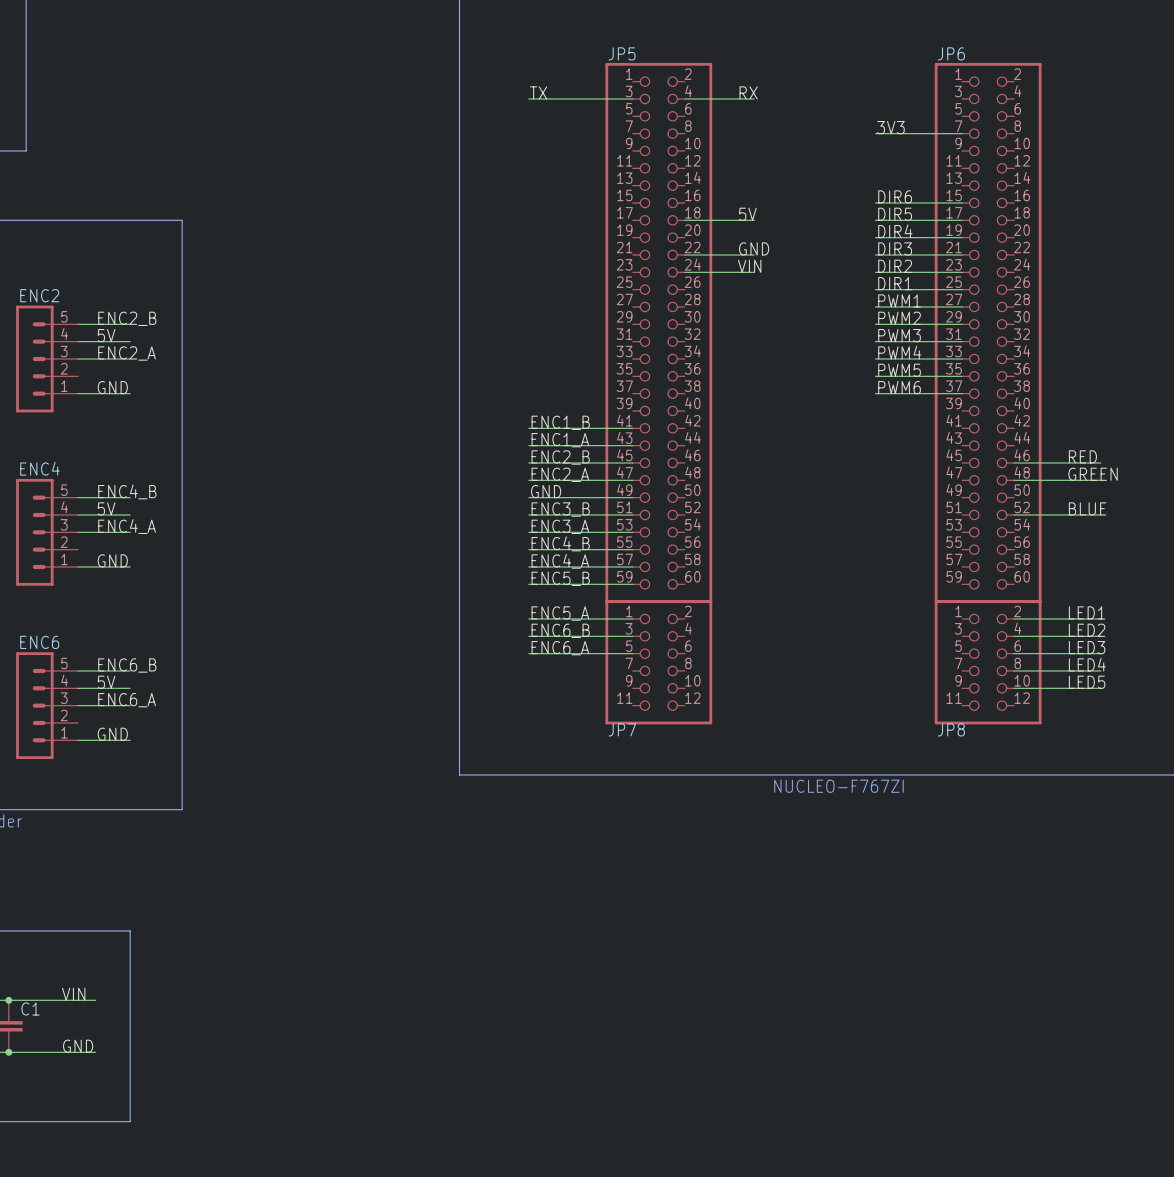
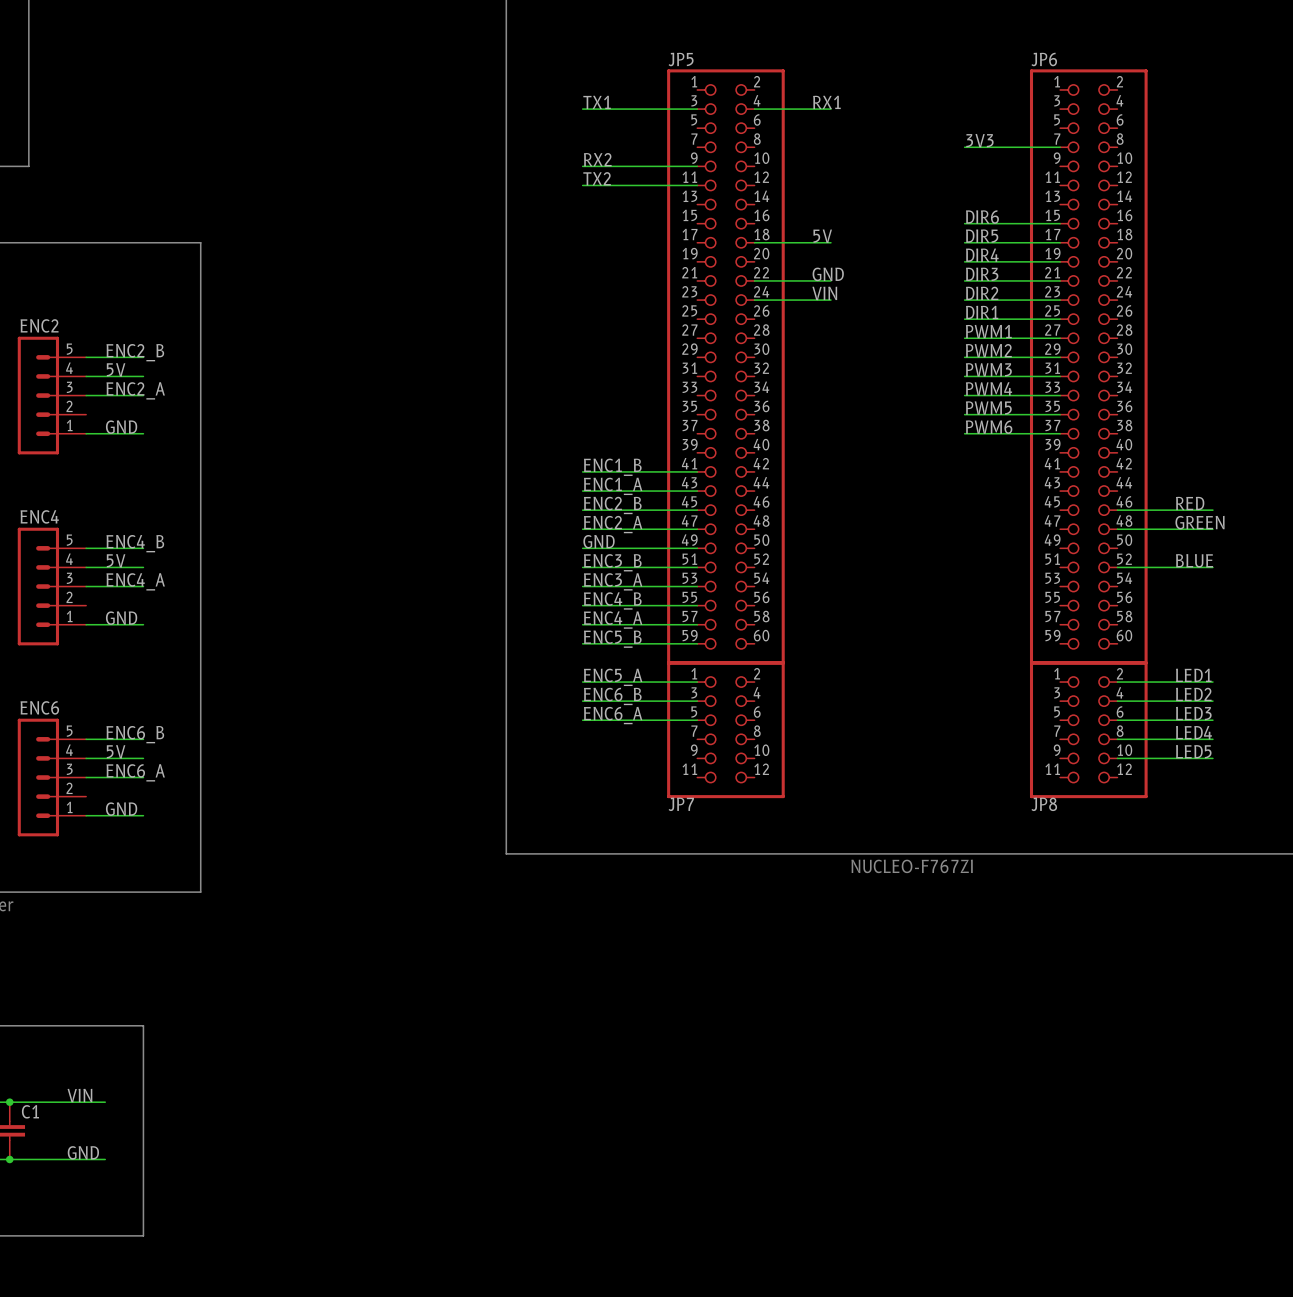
label: TX (538, 92) -> TX1 (597, 102)
label: RX (748, 92) -> RX1 (826, 102)
label: none -> RX2 (597, 159)
wire: none -> (582, 166) (697, 166)
label: none -> TX2 (597, 178)
wire: none -> (582, 185) (697, 185)

